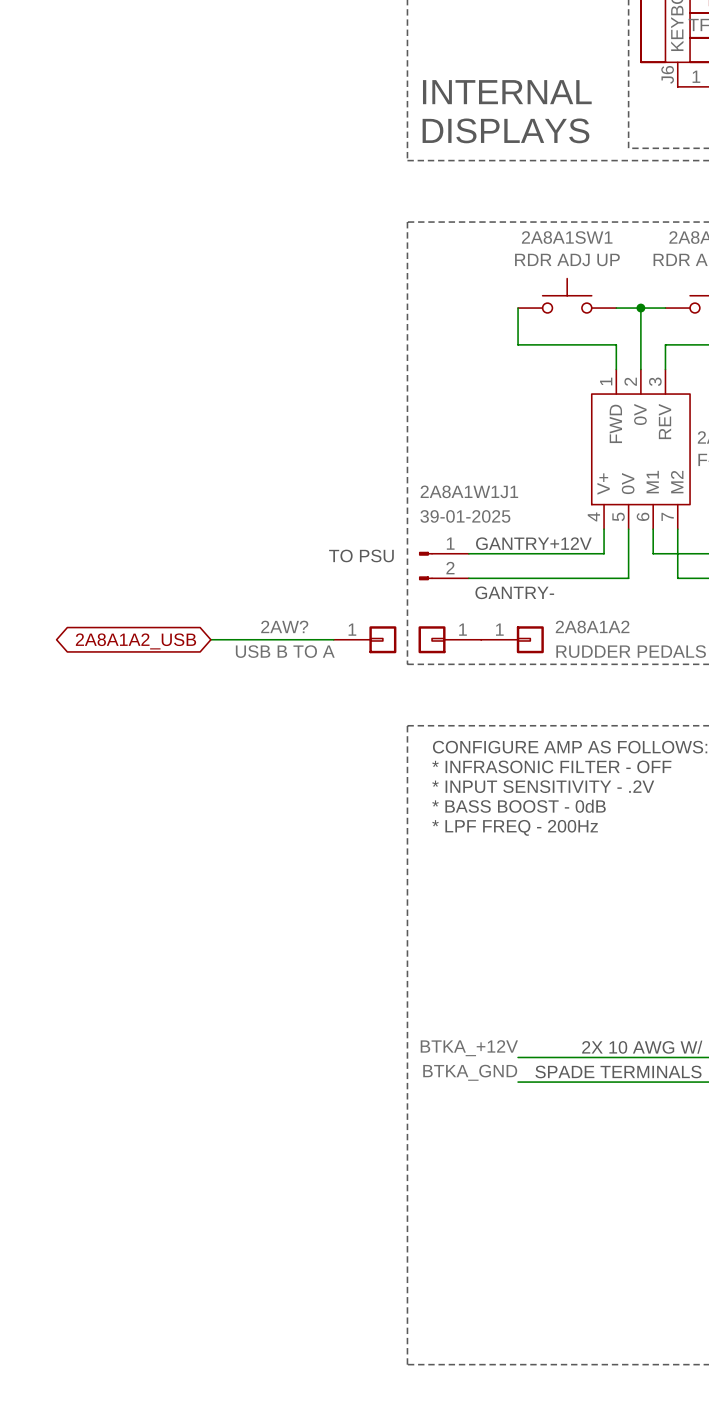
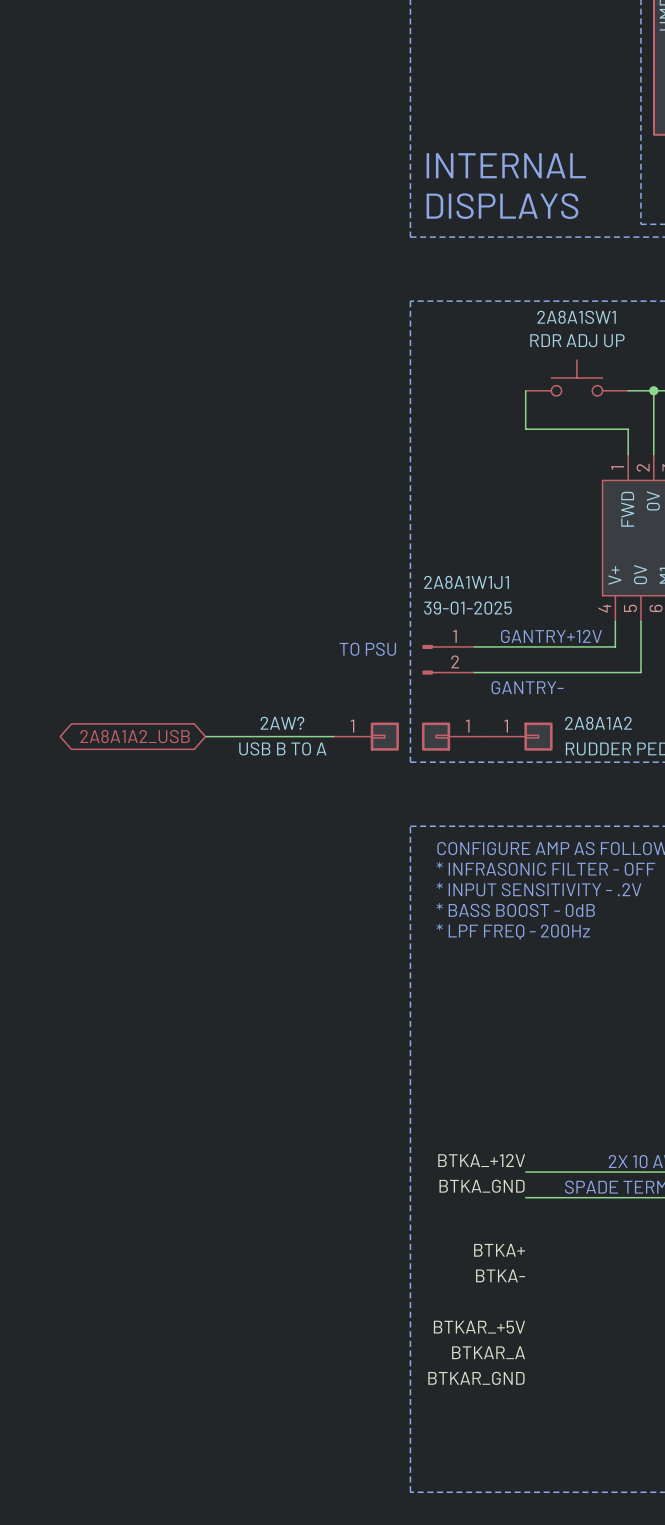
label: none -> BTKA+ (499, 1250)
label: none -> BTKA- (500, 1275)
label: none -> BTKAR_+5V (479, 1327)
label: none -> BTKAR_A (488, 1352)
label: none -> BTKAR_GND (476, 1378)

